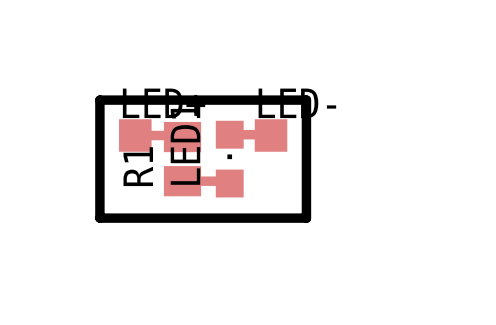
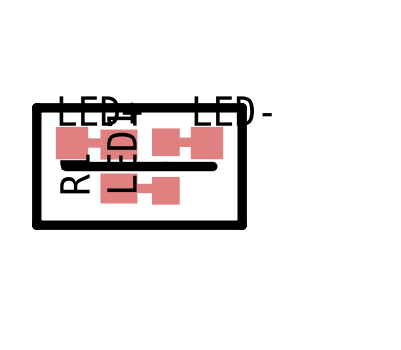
board edge: none -> (66, 166) (212, 166)

